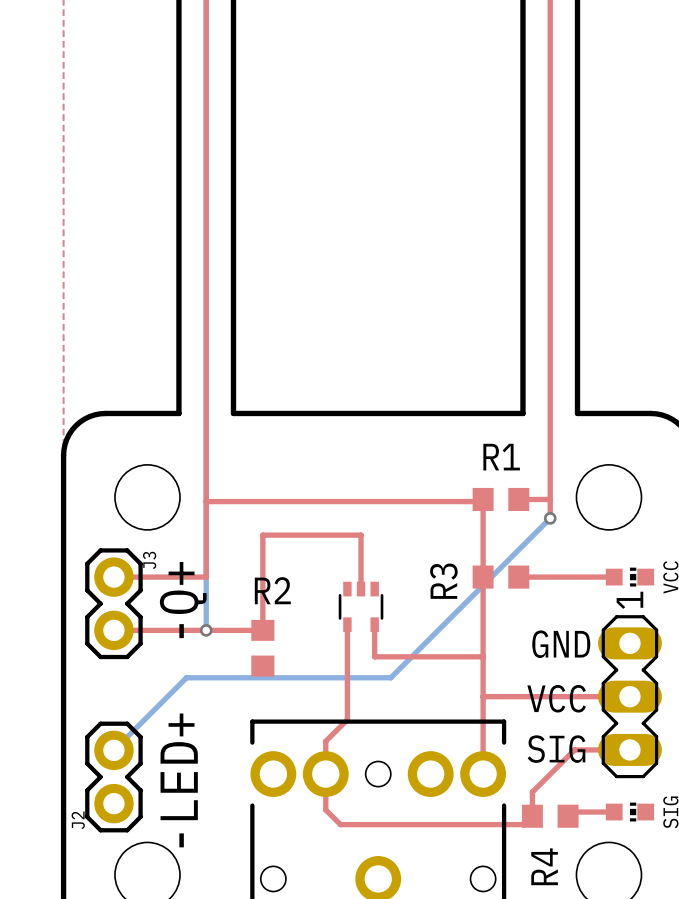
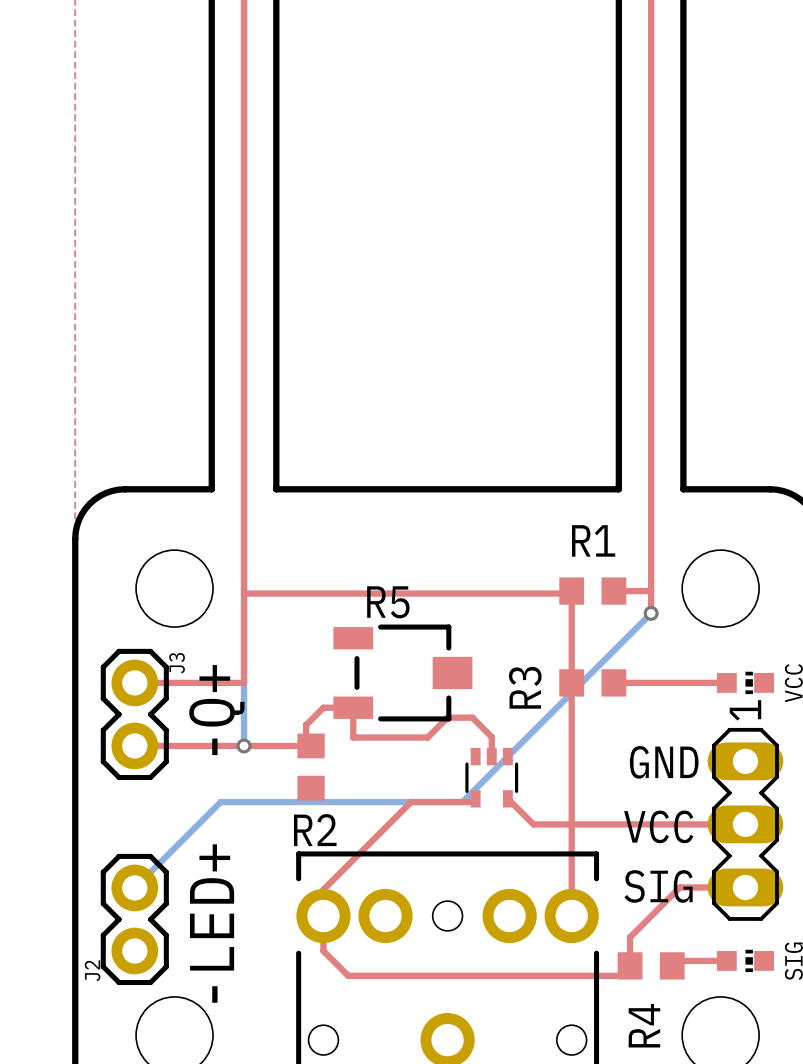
R5: none -> (402, 672)
top track: (361, 589) (361, 535) (262, 535) (262, 630) (258, 630) -> (491, 756) (491, 737) (472, 717) (447, 717) (427, 737) (353, 737) (353, 707) (323, 707) (306, 725) (306, 745)
R2 name position: R2 (272, 590) -> R2 (315, 830)
part position: (361, 606) -> (491, 777)
top track: (347, 624) (347, 719) (325, 741) (325, 809) (340, 824) -> (475, 798) (472, 802) (411, 802) (323, 889) (323, 951) (348, 975) (402, 975)
top track: (374, 624) (374, 656) (483, 656) -> none
top track: none -> (507, 798) (533, 824) (571, 824)

